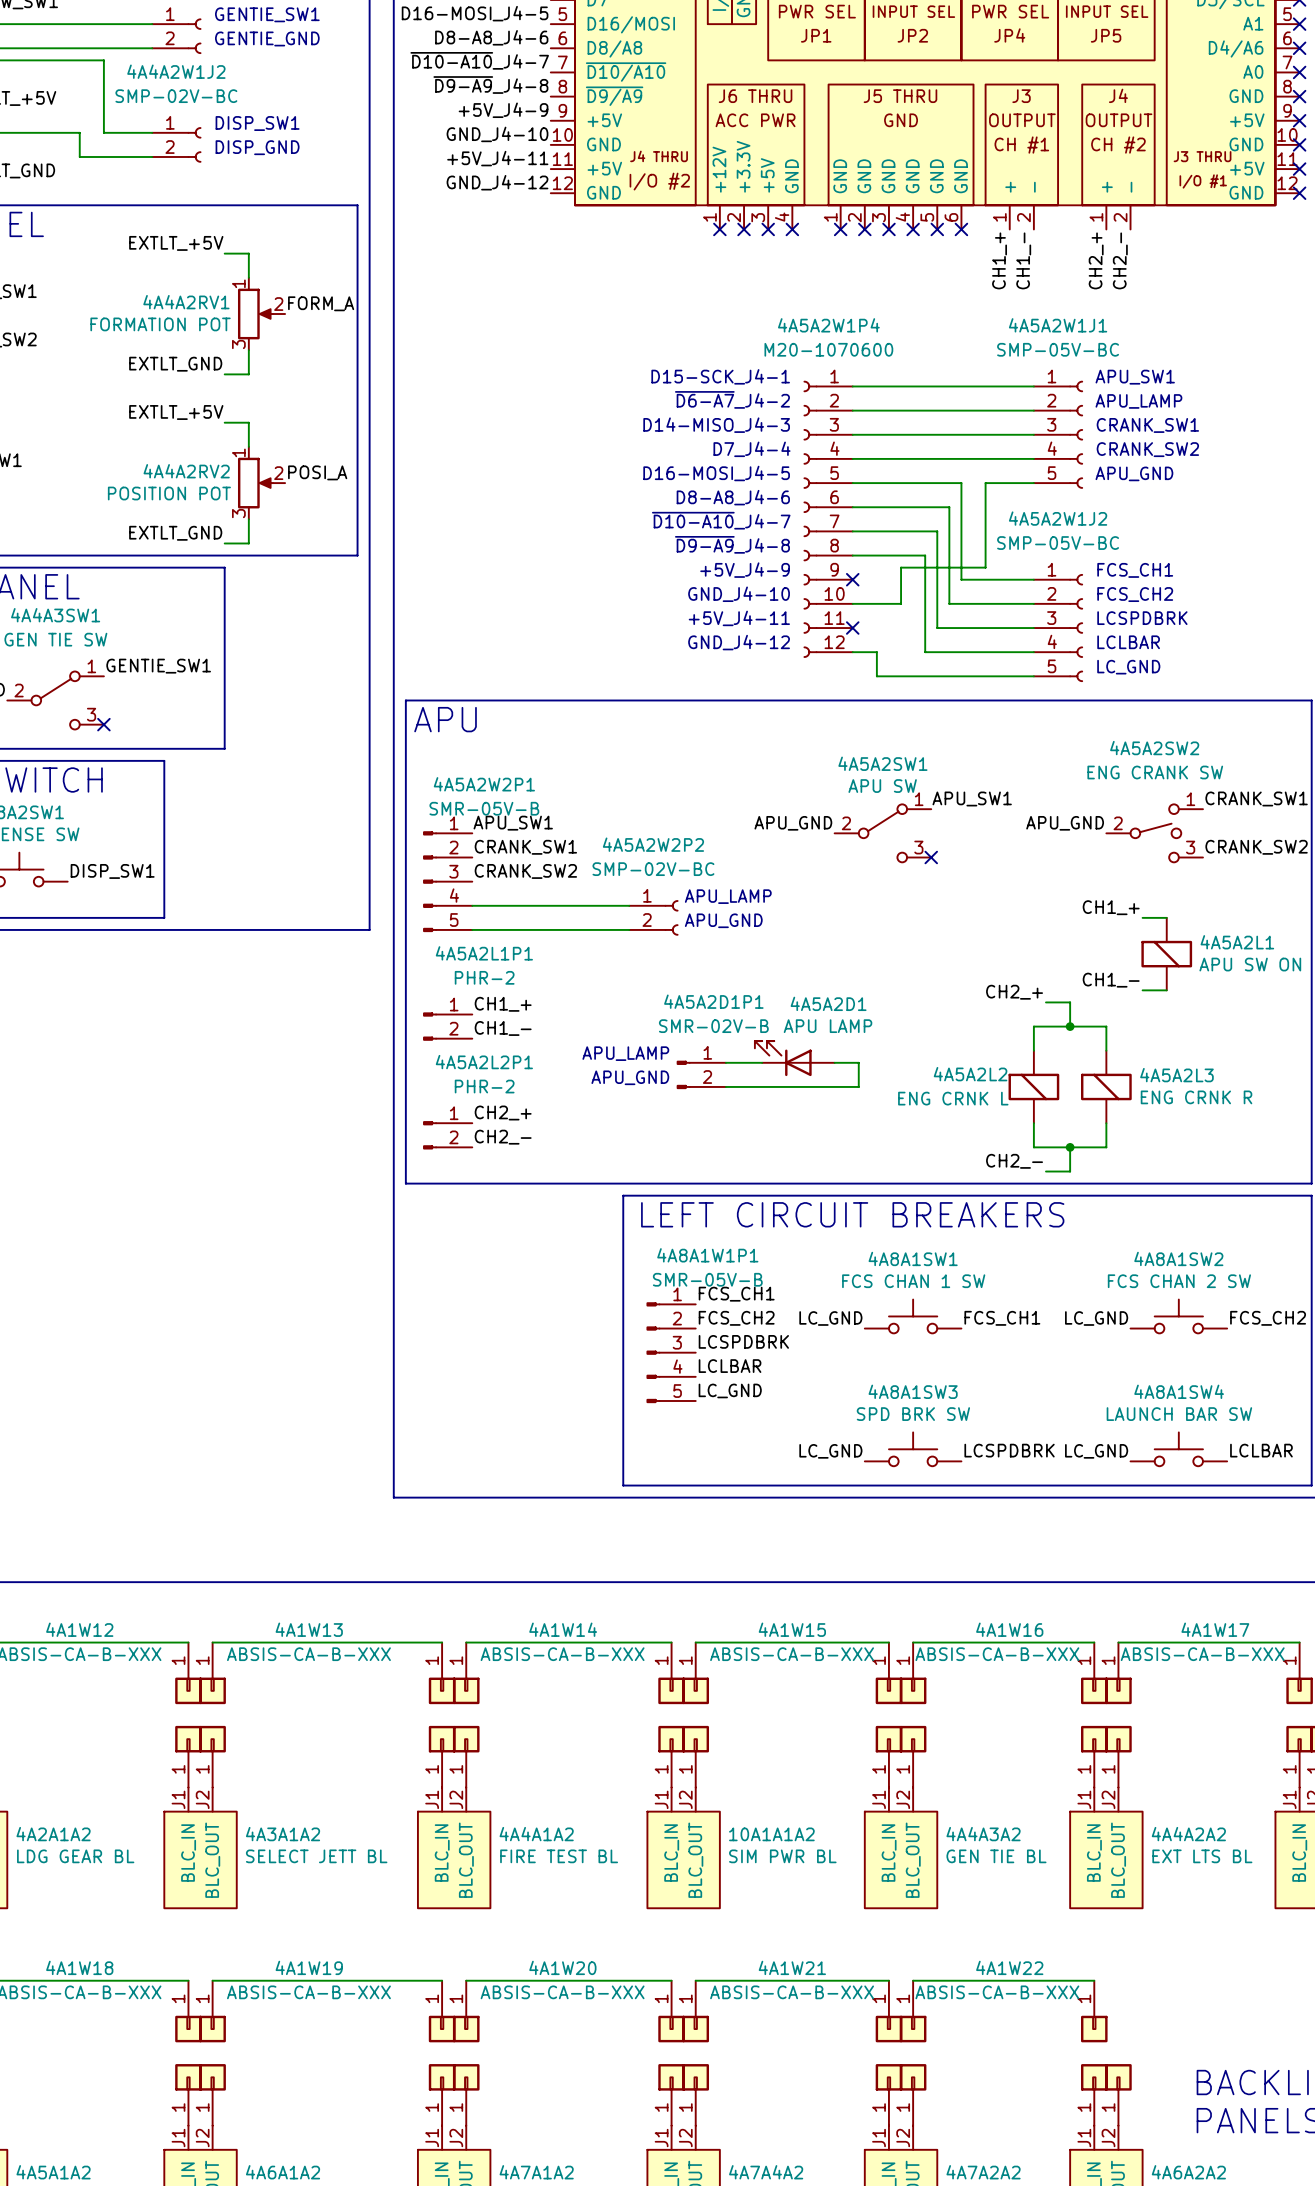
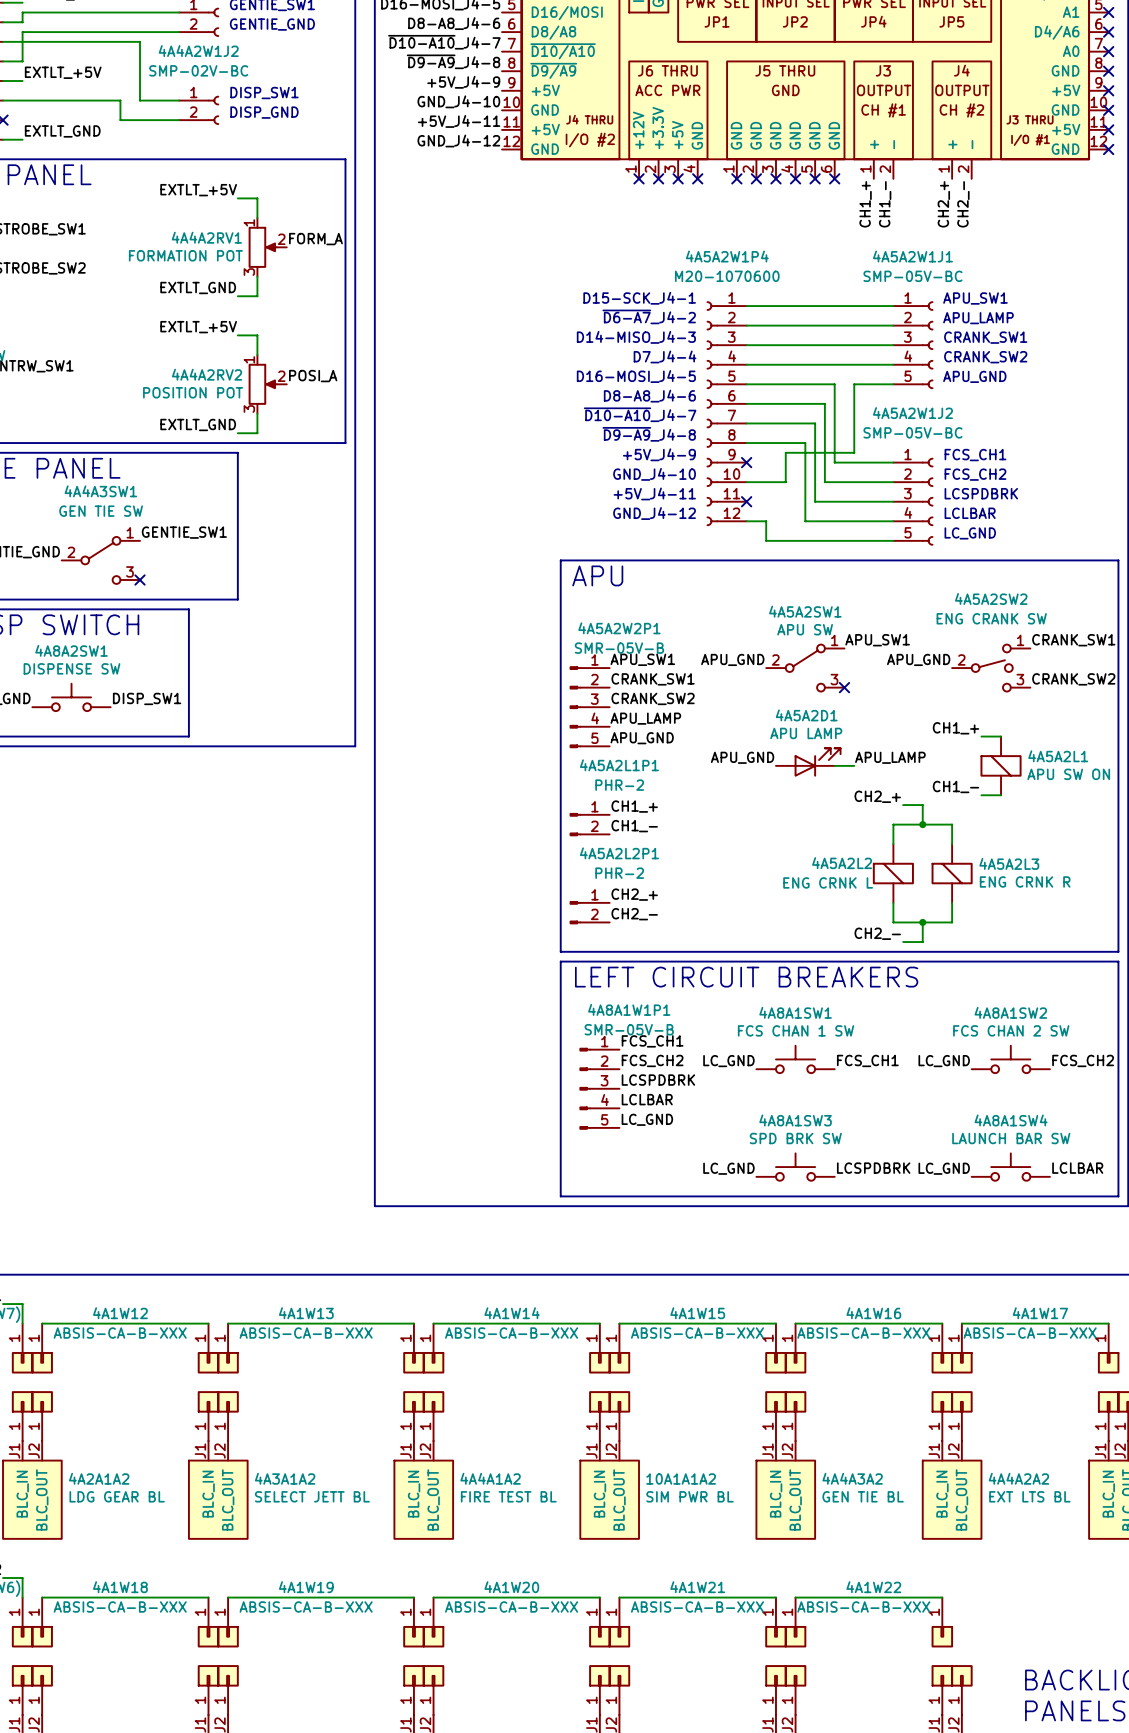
line: (623, 700) (405, 700) (405, 1183) (623, 1183) -> (560, 560) (560, 951)
text position: APU (445, 719) -> APU (597, 575)
label position: APU_SW1 (972, 798) -> APU_SW1 (877, 640)
label: APU_SW1 (513, 823) -> none
label: none -> APU_SW1 (642, 659)
label position: APU_GND (793, 823) -> APU_GND (732, 659)
4A5A2SW1 position: (882, 833) -> (805, 668)
label position: CRANK_SW1 (525, 847) -> CRANK_SW1 (653, 679)
no-connect mark position: (931, 857) -> (844, 687)
label position: CRANK_SW2 (525, 871) -> CRANK_SW2 (653, 698)
4A5A2W2P1 position: (447, 881) -> (589, 707)
label: none -> APU_LAMP (645, 718)
text: APU_LAMP (728, 896) -> none
wire: (472, 905) (629, 905) -> none
4A5A2W2P2: SMP-02V-BC (653, 917) -> none
label: none -> APU_GND (642, 738)
text: APU_GND (723, 920) -> none
wire: (472, 929) (629, 929) -> none
label: none -> APU_GND (742, 757)
label: none -> APU_LAMP (890, 757)
wire: none -> (834, 765) (854, 765)
4A5A2D1 name position: 4A5A2D1 (828, 1003) -> 4A5A2D1 (806, 715)
label position: CH1_+ (503, 1004) -> CH1_+ (634, 806)
4A5A2L1P1 position: (447, 1026) -> (589, 824)
4A5A2D1 value position: APU LAMP (828, 1026) -> APU LAMP (806, 733)
label position: CH1_- (503, 1028) -> CH1_- (634, 826)
text: APU_LAMP (625, 1053) -> none
4A5A2D1 flip: as is (783, 1058) -> left-right (817, 762)
4A5A2D1 position: (794, 1058) -> (808, 762)
wire: (725, 1062) (762, 1062) -> none
wire: (834, 1062) (858, 1062) (858, 1086) (725, 1086) -> none
4A5A2D1P1: SMR-02V-B (701, 1074) -> none
text: APU_GND (630, 1077) -> none
label position: CH2_+ (503, 1113) -> CH2_+ (634, 894)
4A5A2L2P1 position: (447, 1135) -> (589, 912)
label position: CH2_- (503, 1137) -> CH2_- (634, 914)

